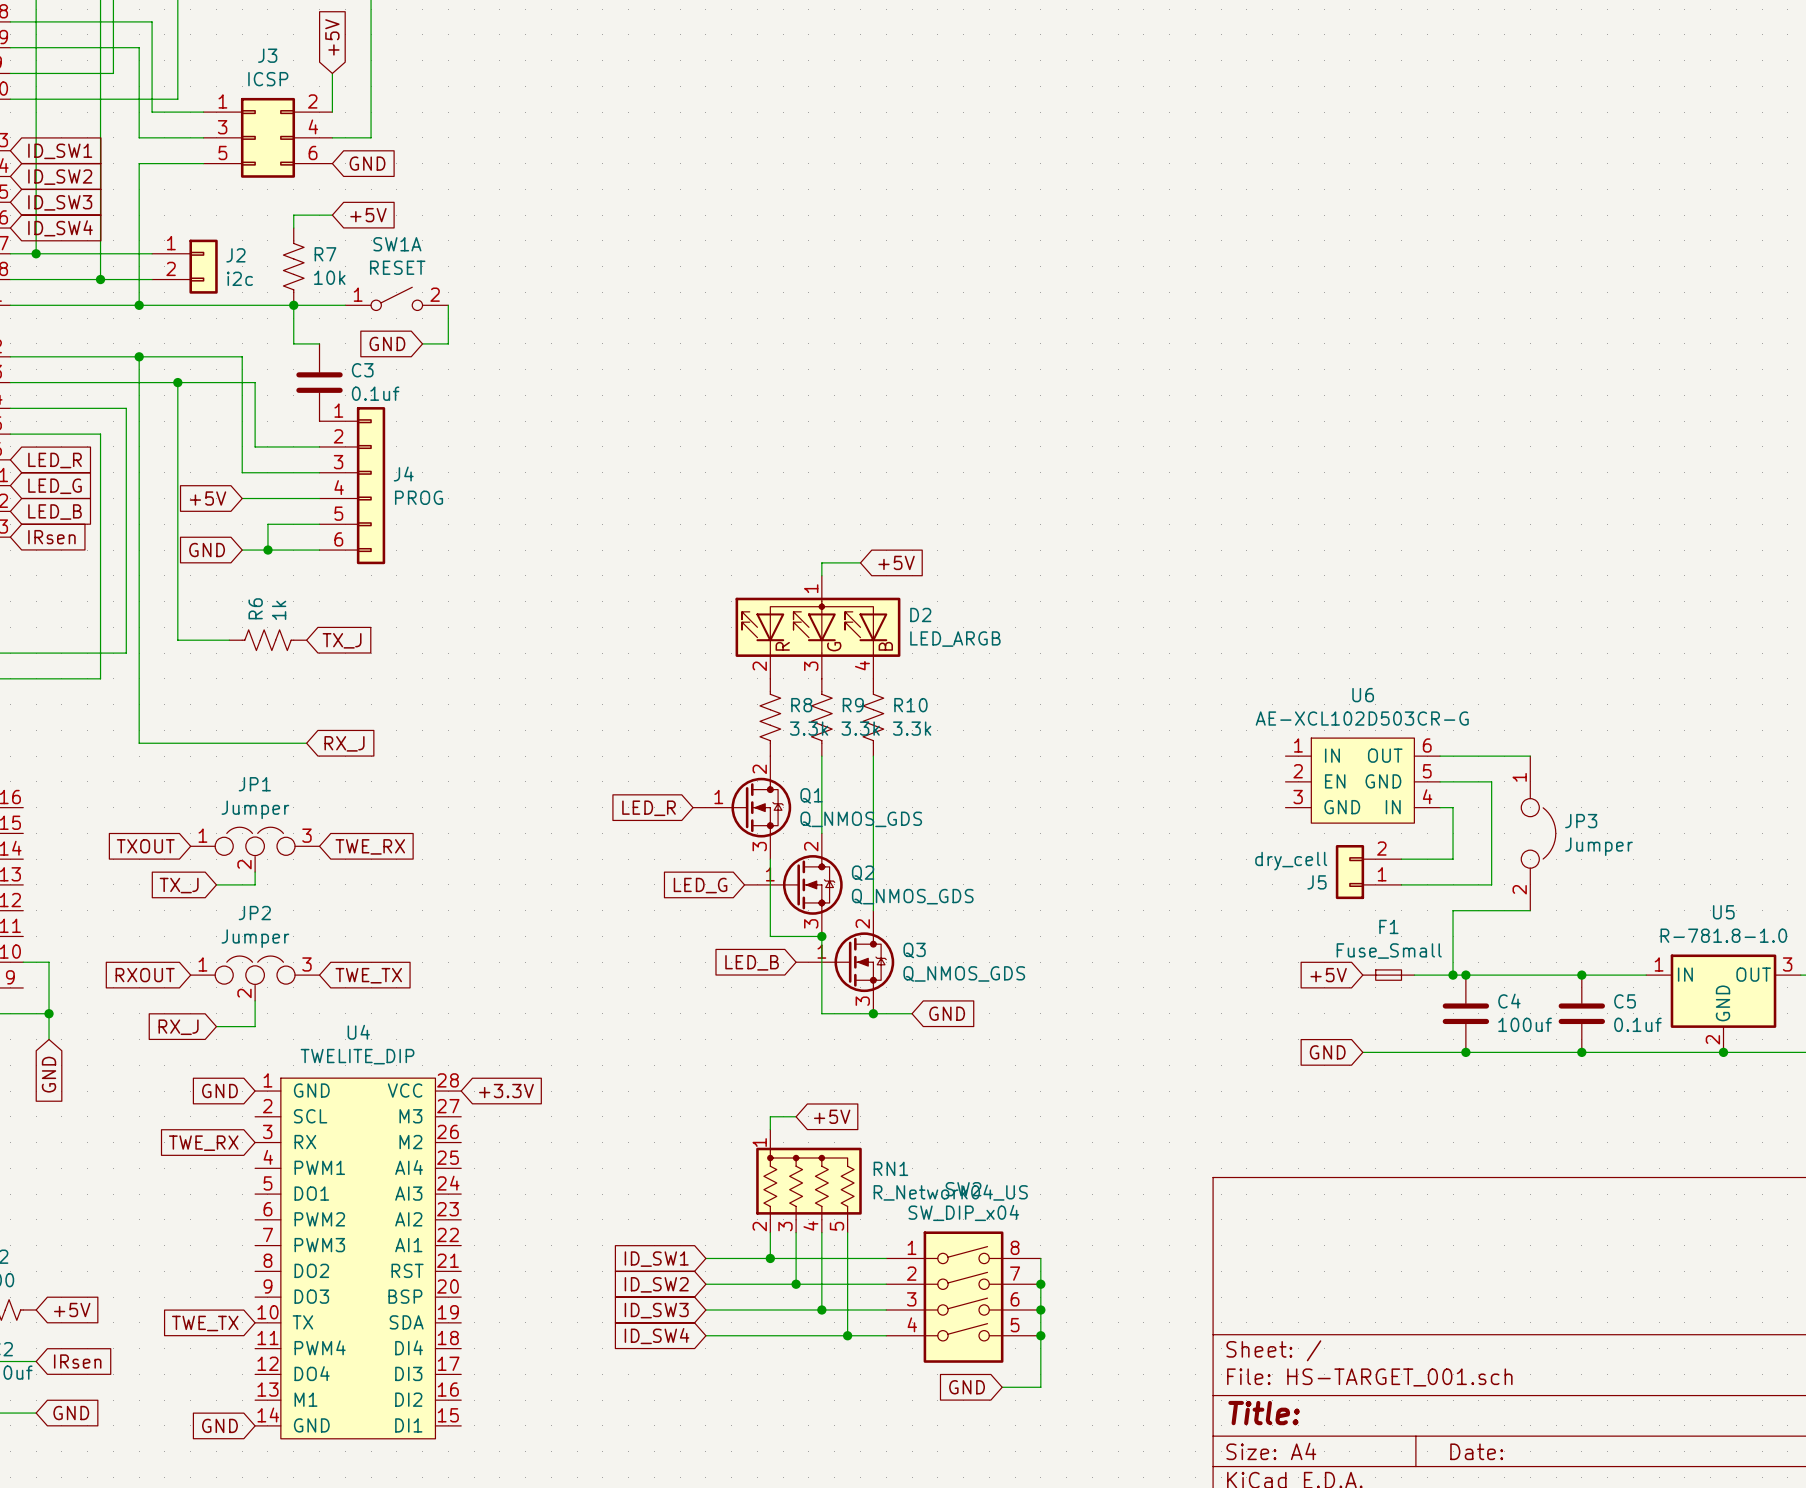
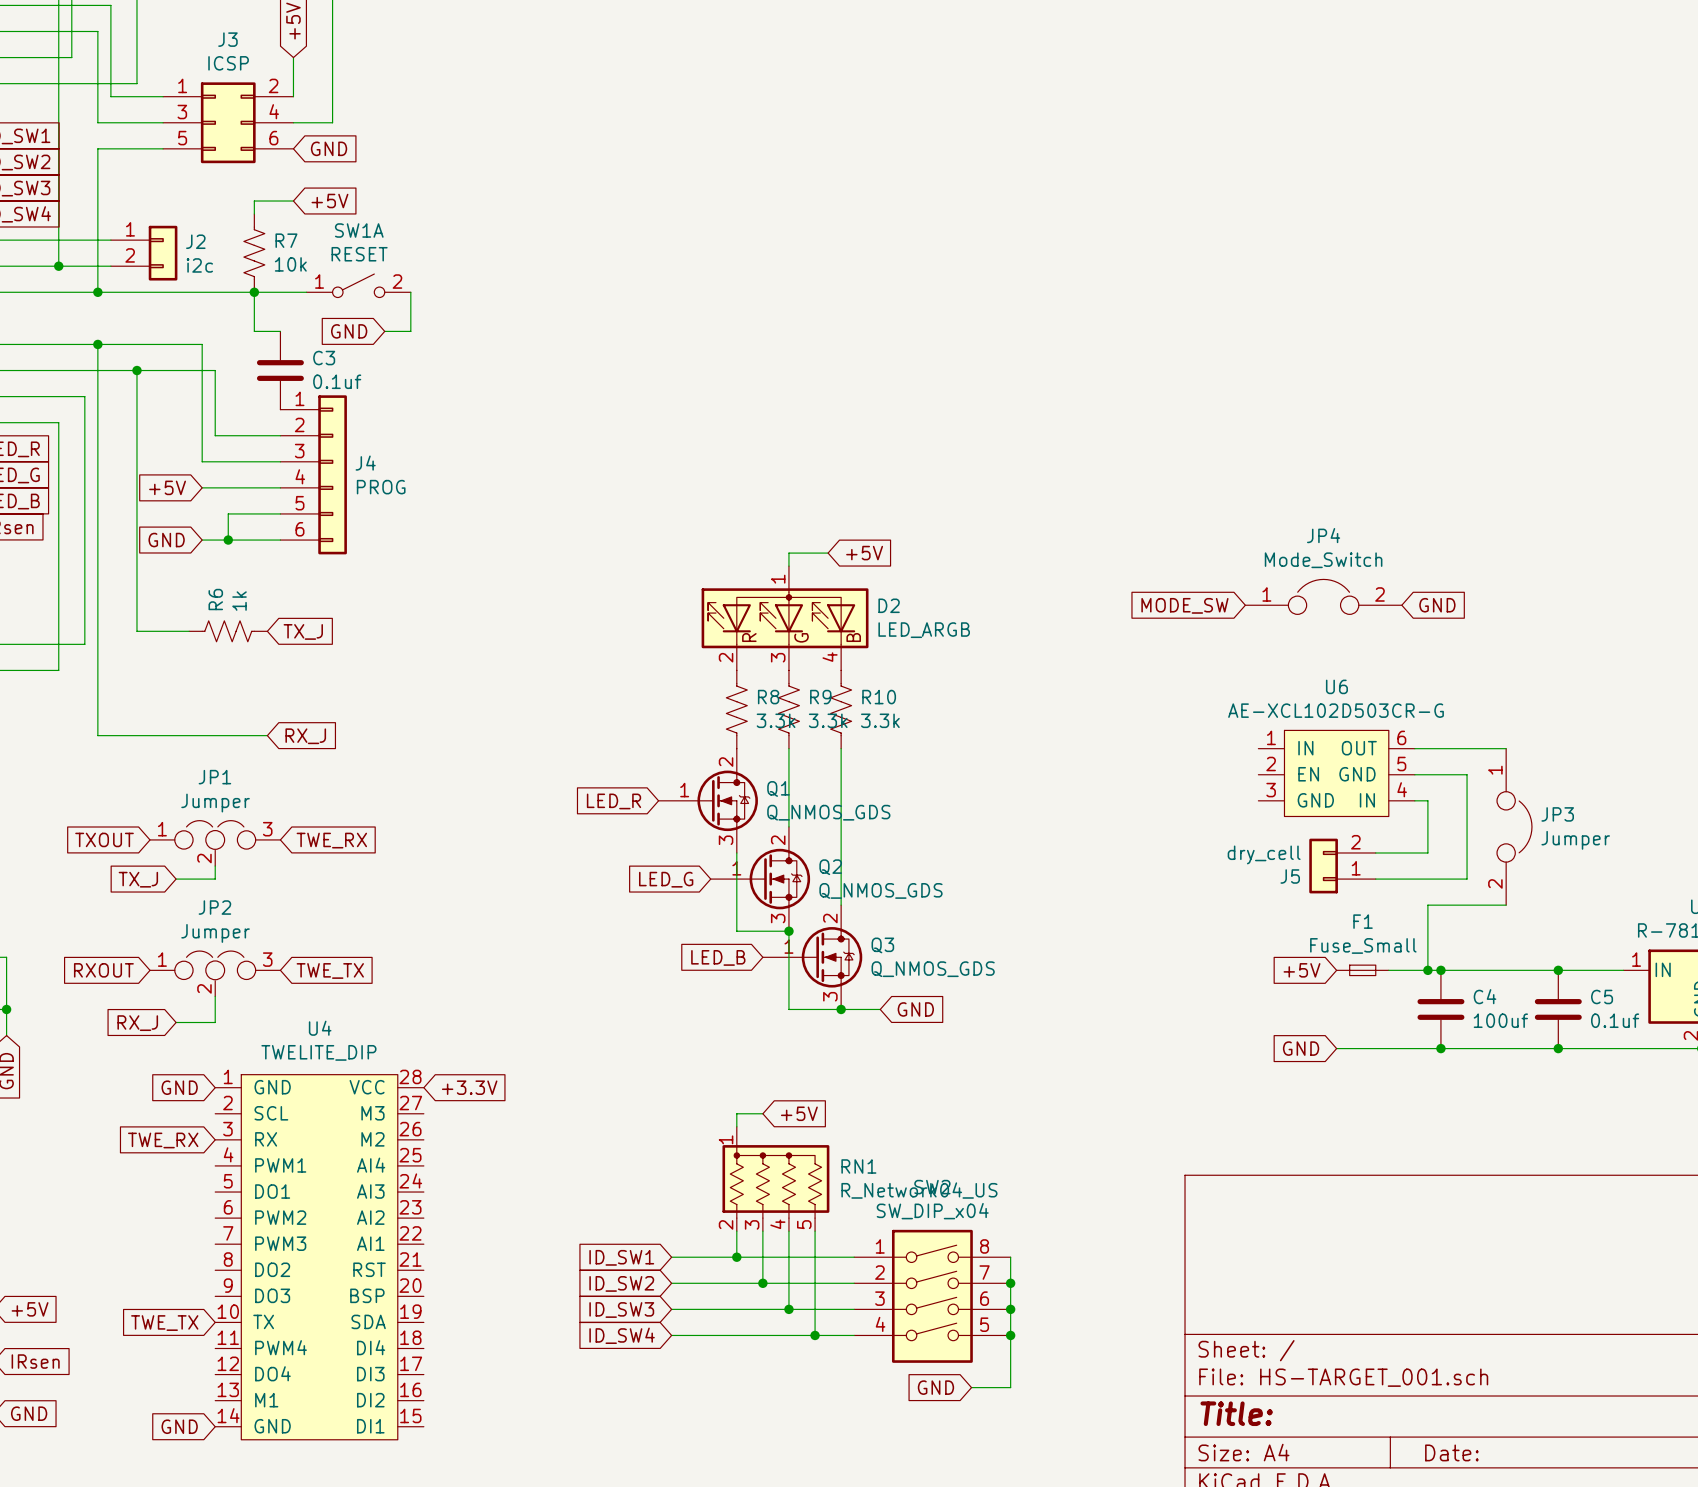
JP4: none -> Mode_Switch (1323, 596)
global label: none -> GND (1437, 605)
global label: none -> MODE_SW (1184, 605)

